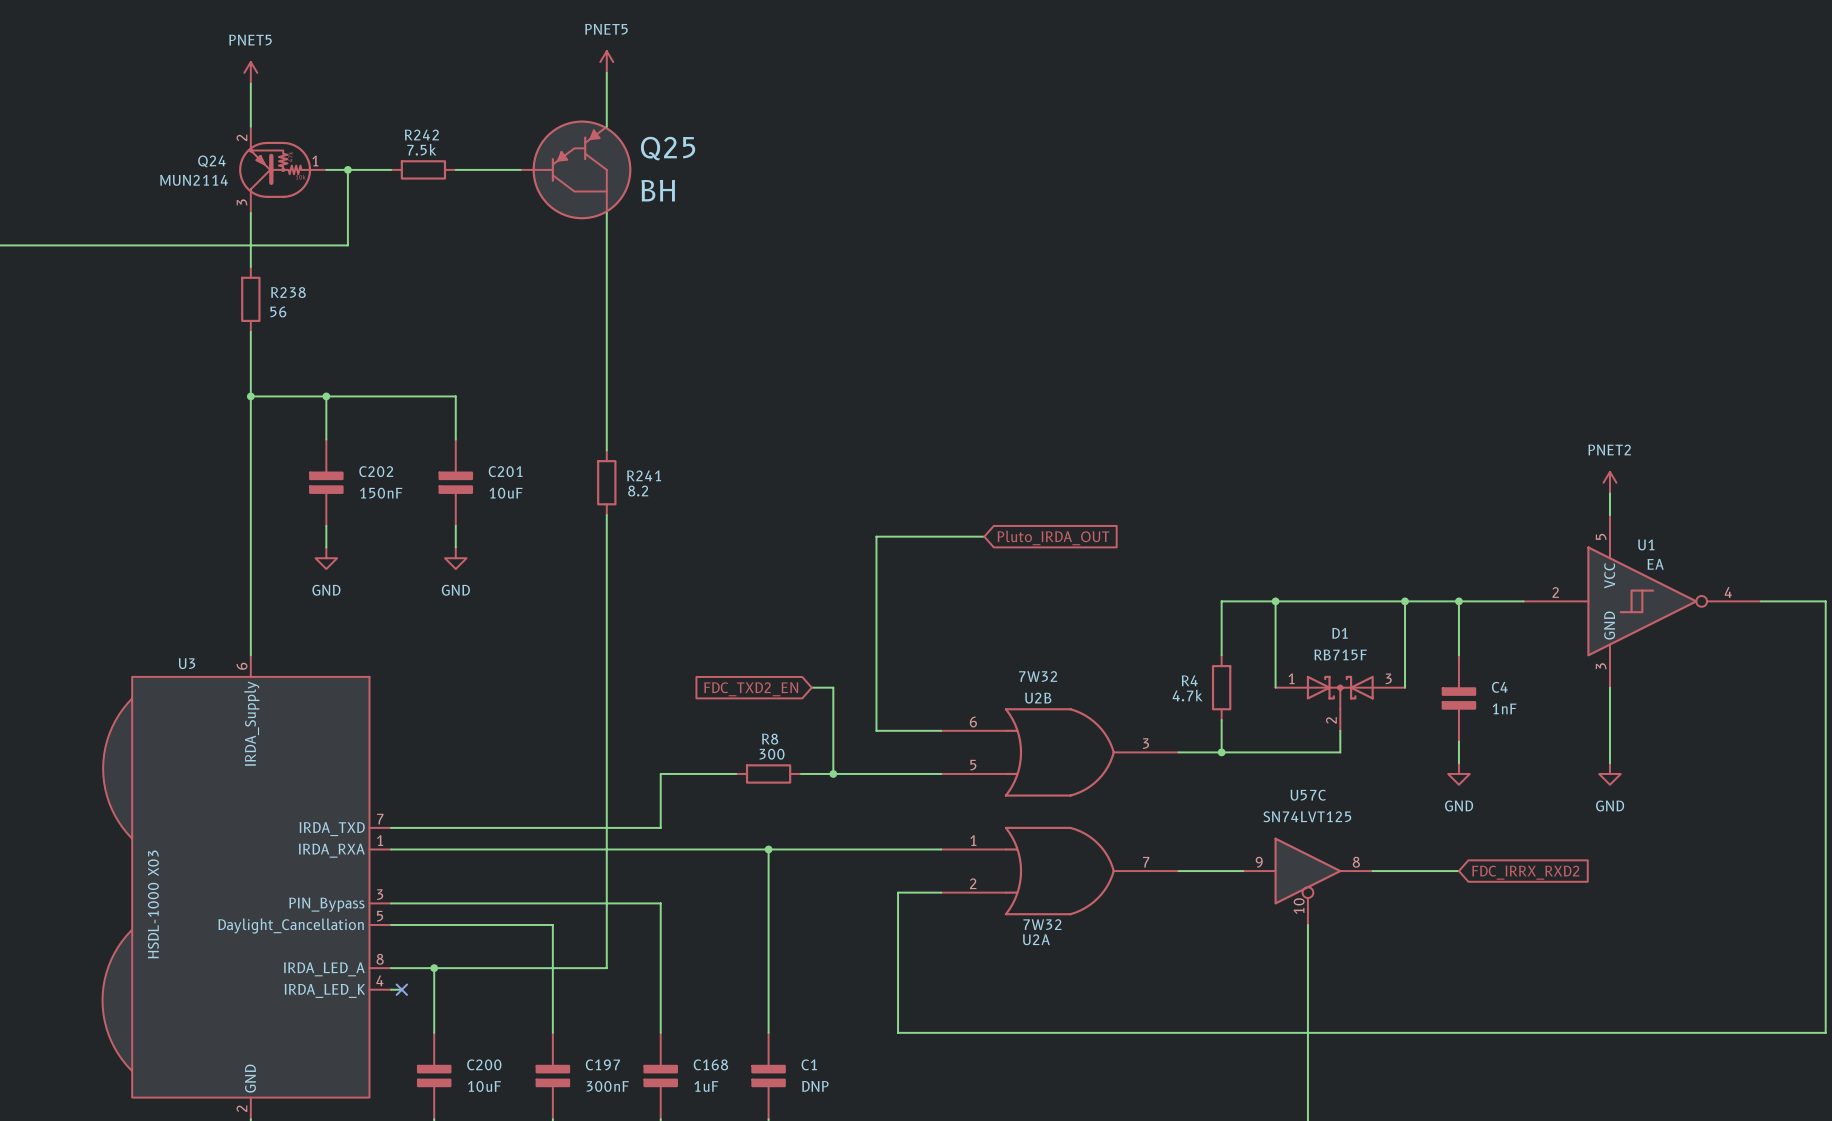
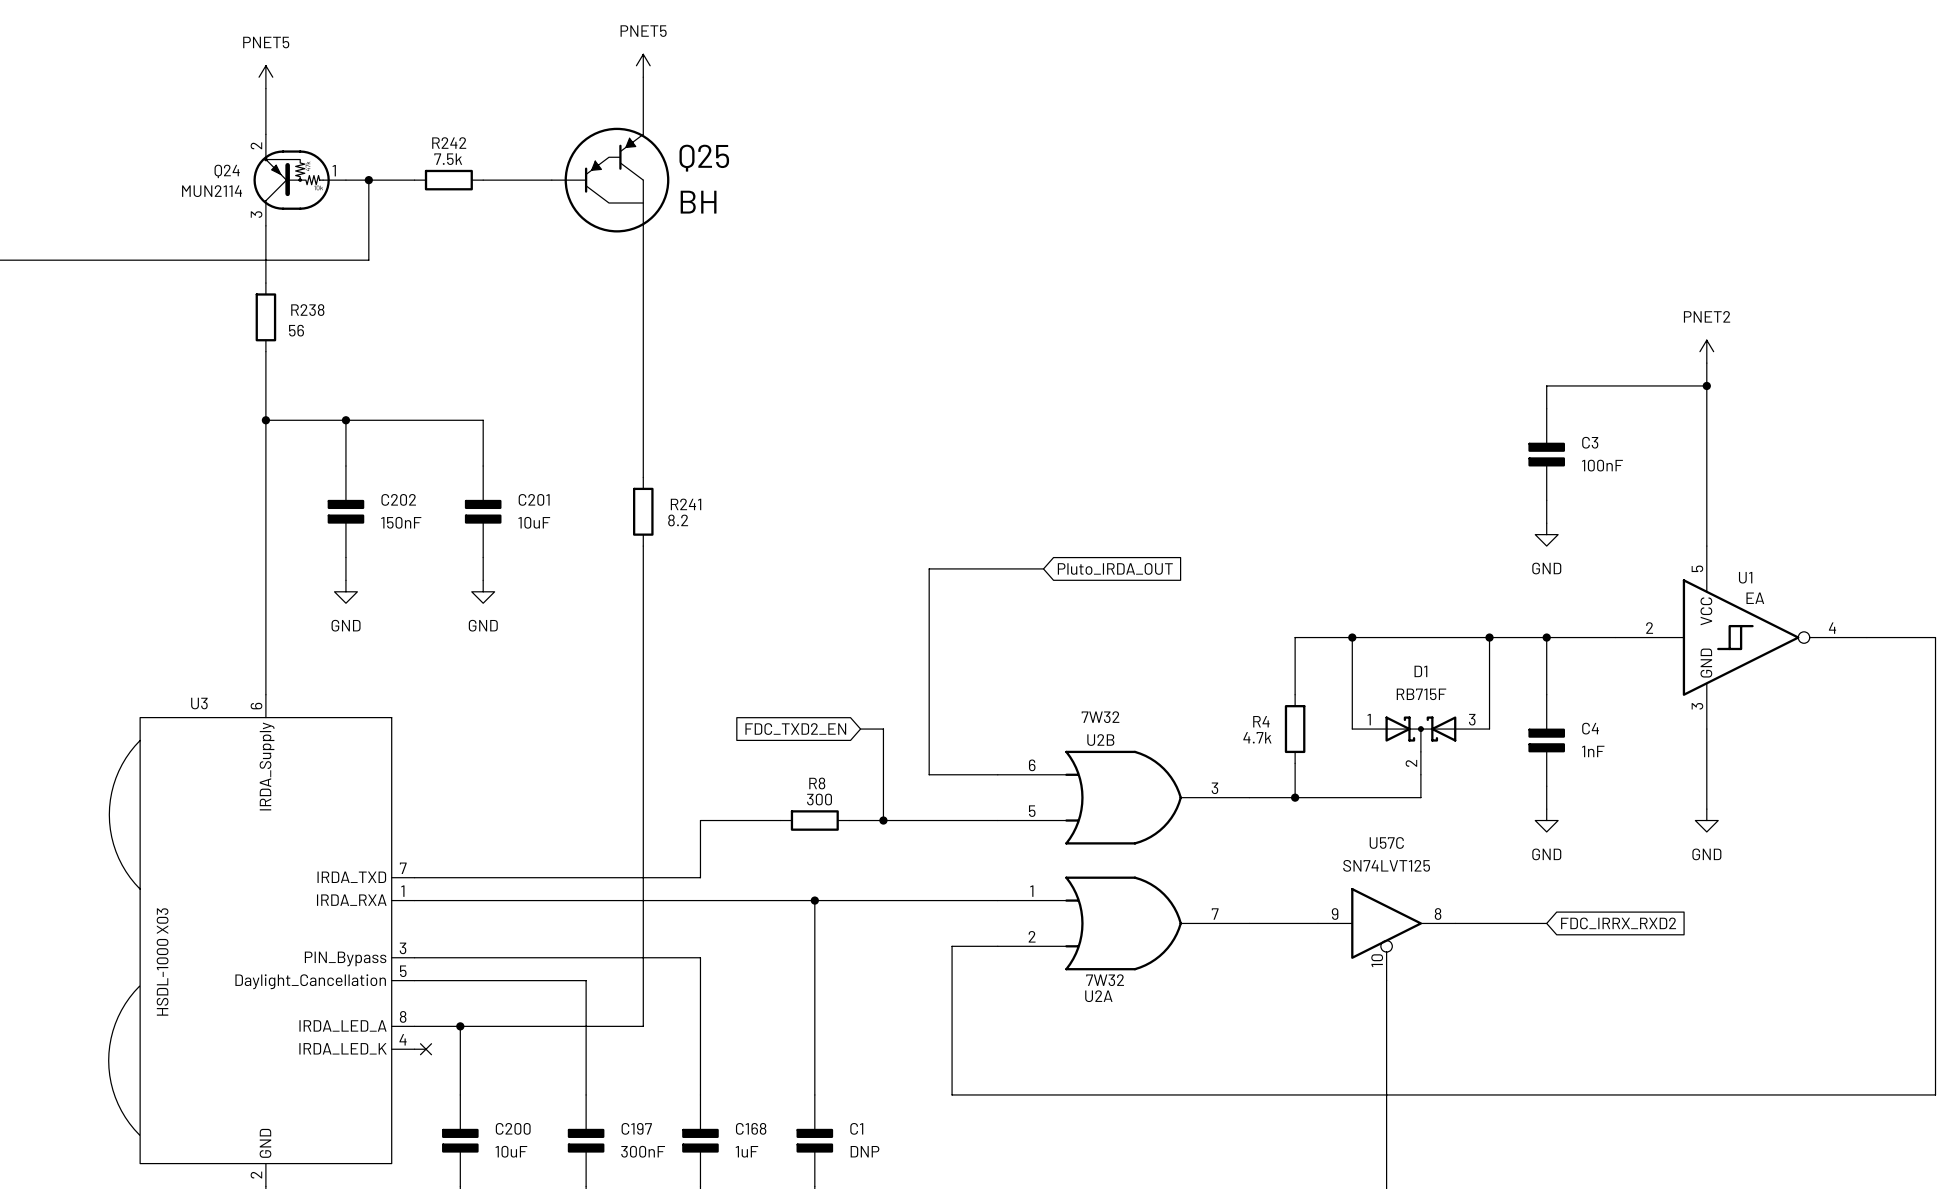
wire: none -> (1706, 363) (1706, 523)
wire: none -> (1706, 385) (1546, 385) (1546, 408)
junction: none -> (1706, 385)
C3: none -> 100nF (1546, 454)
wire: none -> (1546, 500) (1546, 523)
power symbol position: PNET2 (1609, 482) -> PNET2 (1706, 351)
power symbol: none -> GND (1546, 534)

